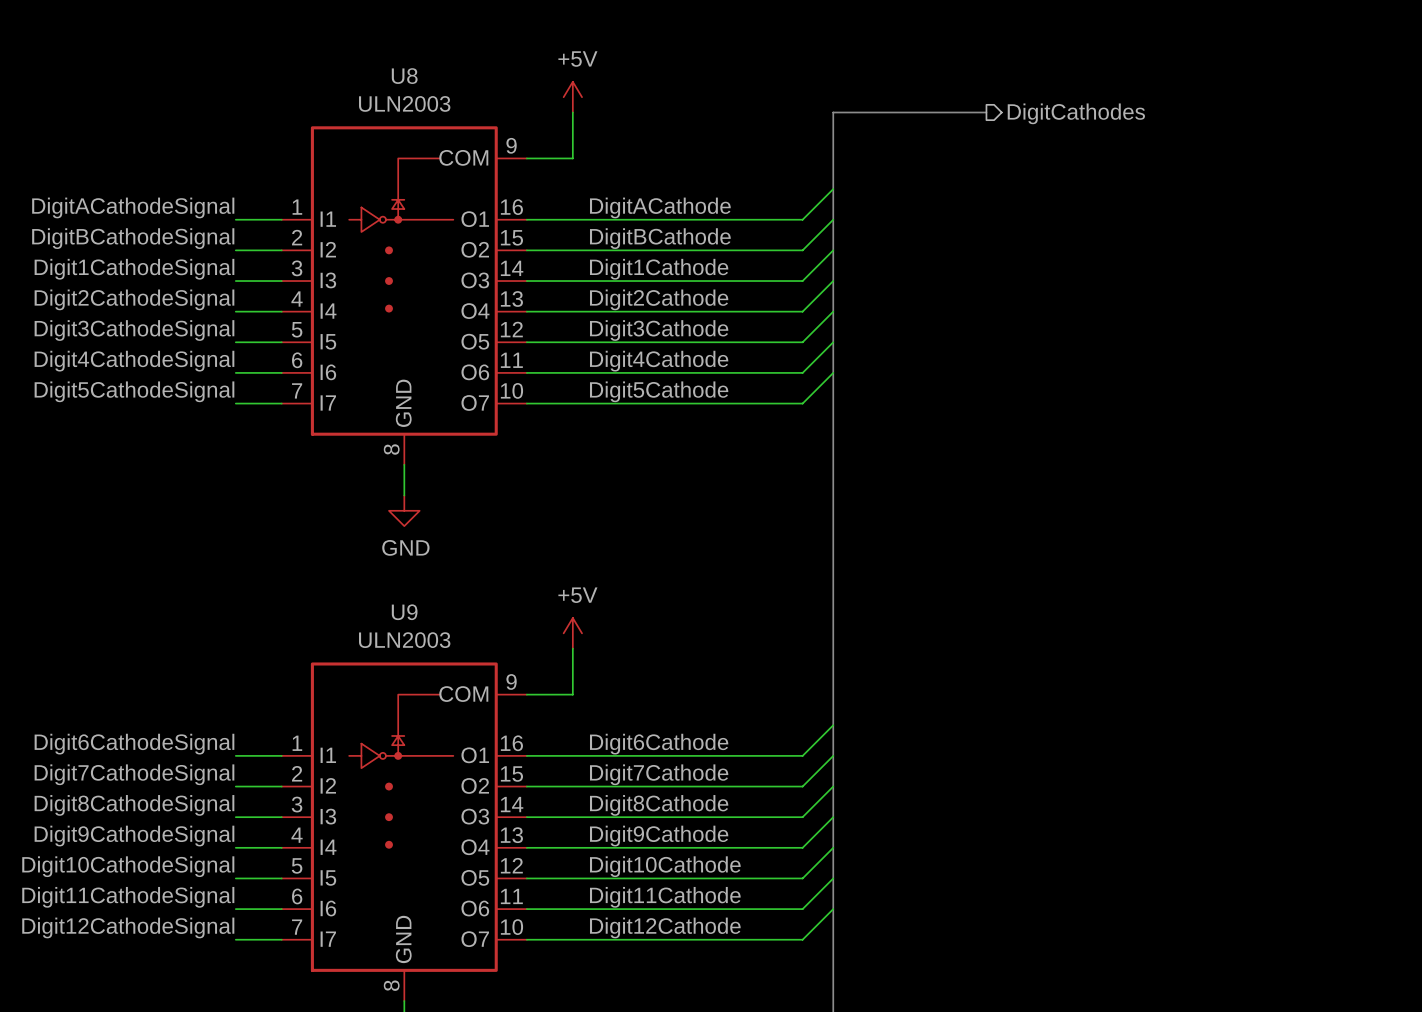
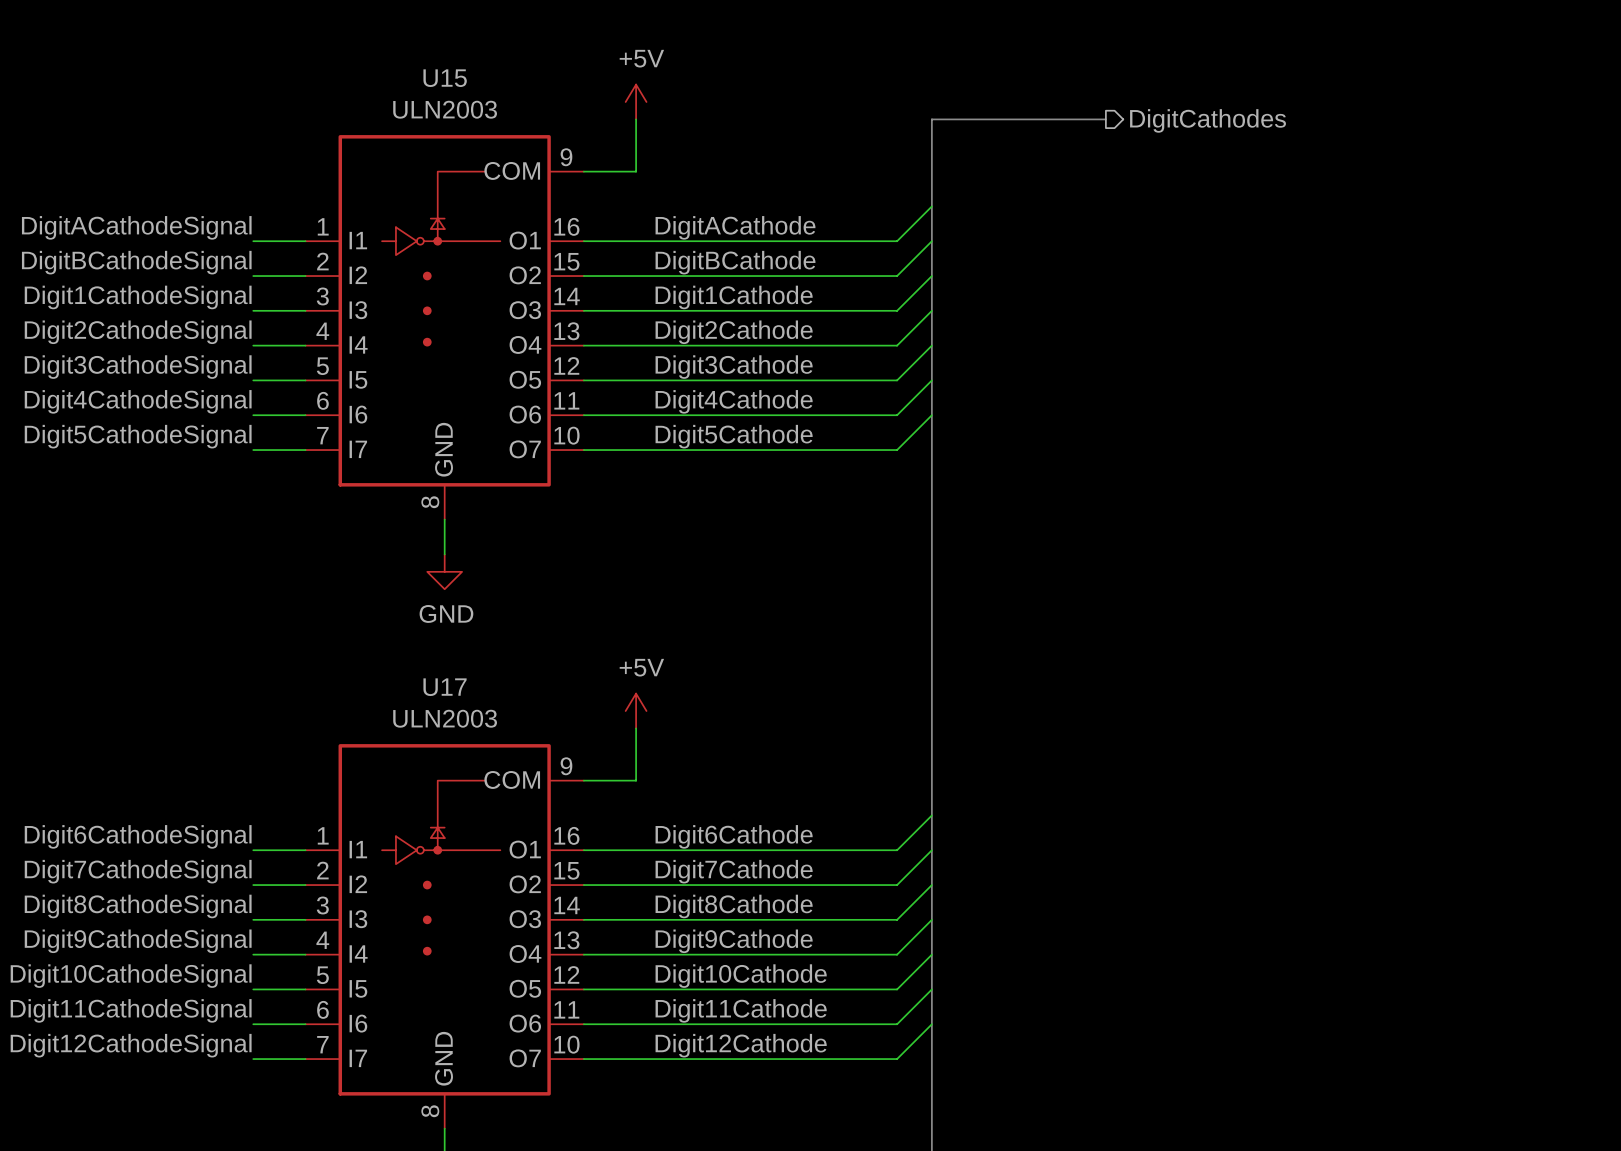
U8 name: U8 (404, 76) -> U15 (445, 78)
U9 name: U9 (404, 612) -> U17 (445, 687)

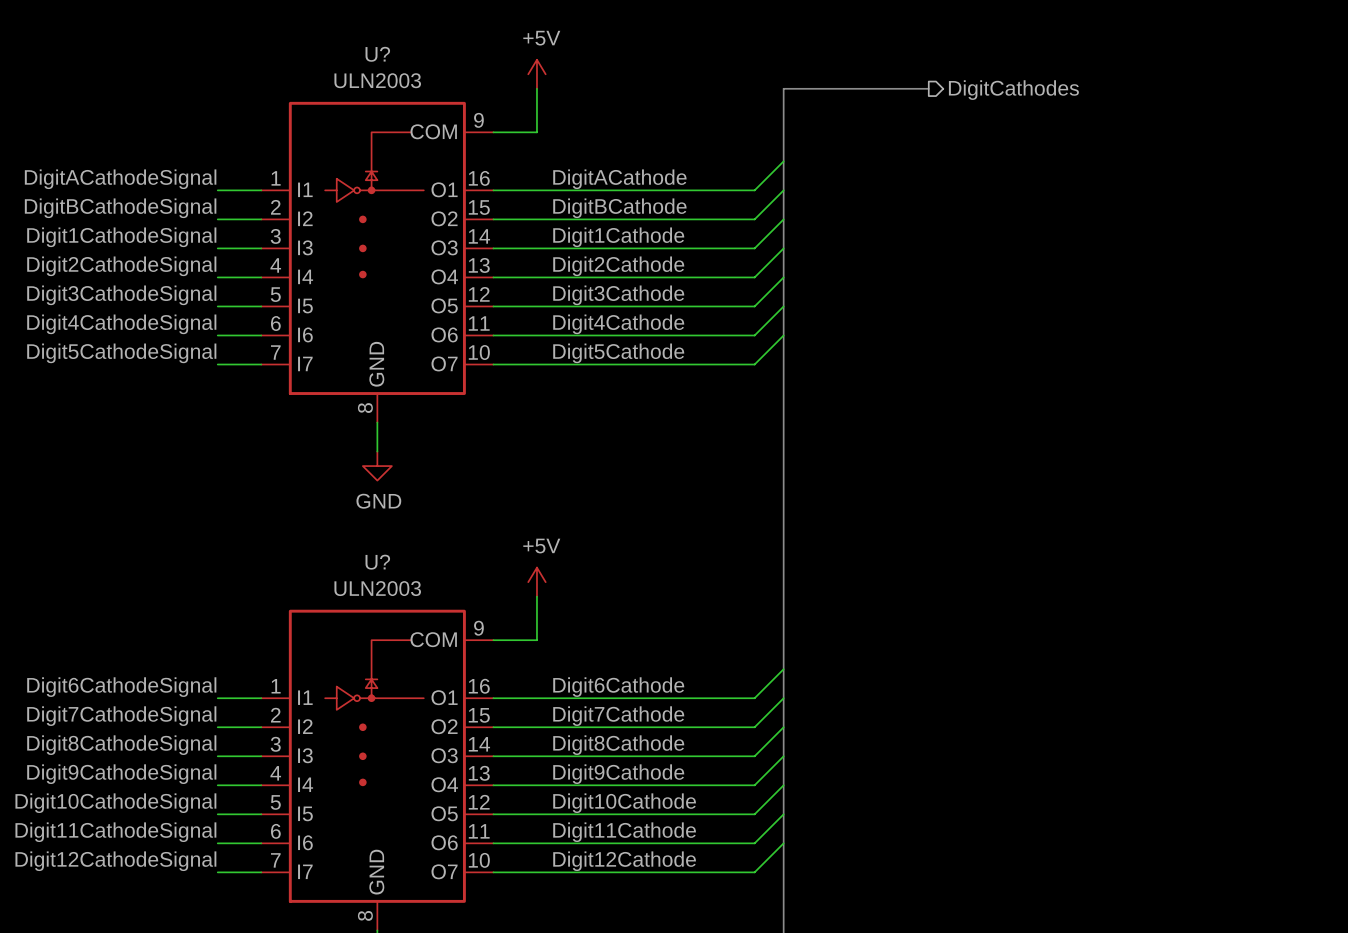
U15 name: U15 (445, 78) -> U? (377, 54)
U17 name: U17 (445, 687) -> U? (377, 562)

